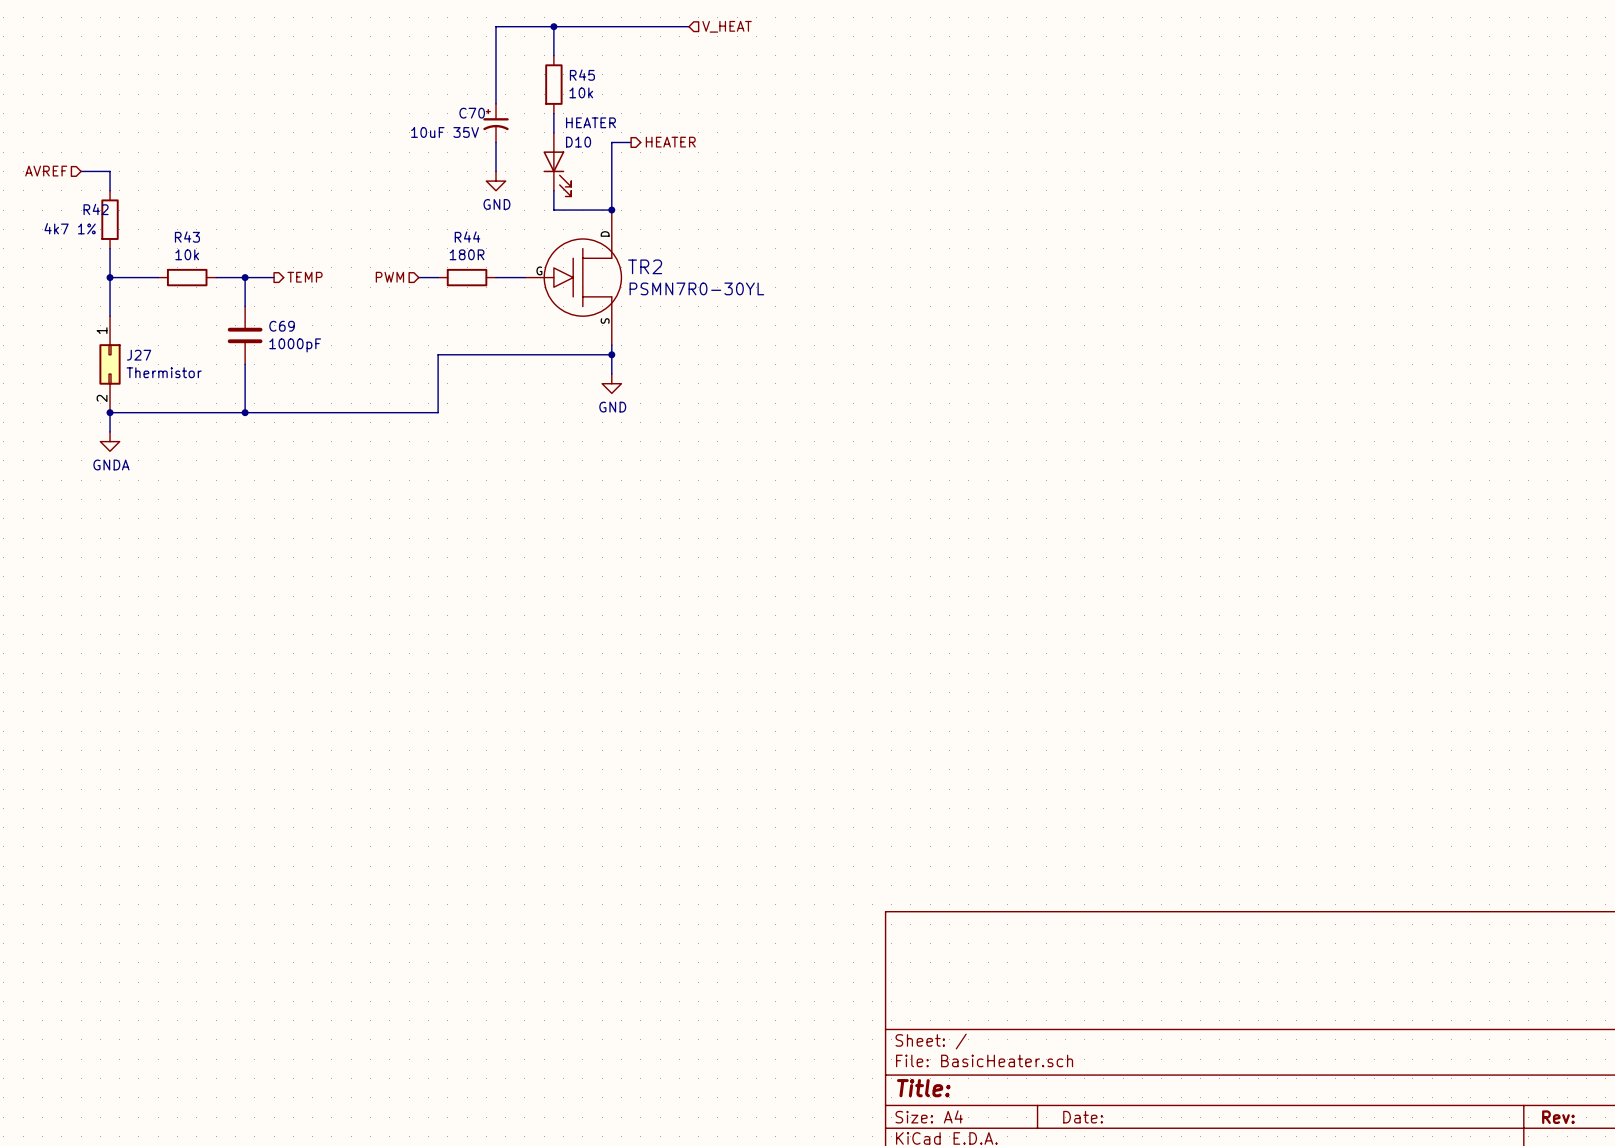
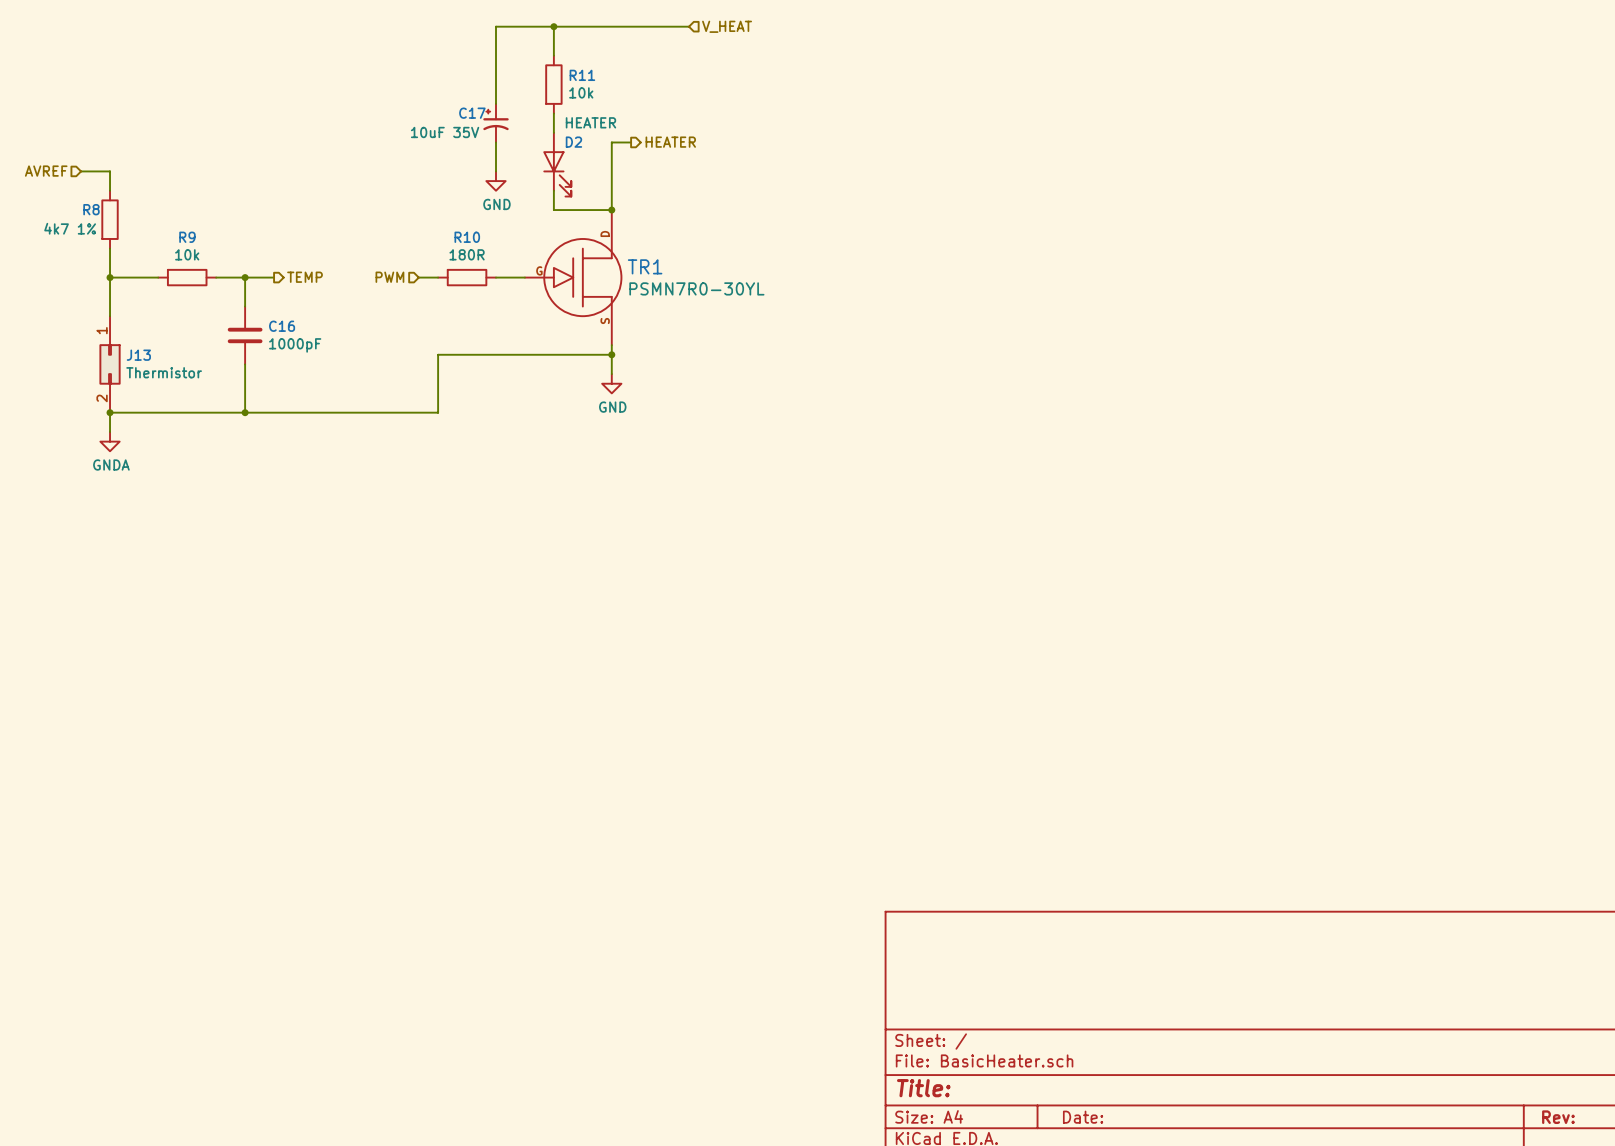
R45 name: R45 (582, 75) -> R11 (582, 75)
C70 name: C70 (472, 113) -> C17 (472, 113)
D10 name: D10 (578, 142) -> D2 (573, 142)
R42 name: R42 (96, 209) -> R8 (91, 209)
R43 name: R43 (187, 237) -> R9 (187, 237)
R44 name: R44 (467, 237) -> R10 (467, 237)
TR2 name: TR2 (645, 266) -> TR1 (645, 266)
C69 name: C69 (282, 326) -> C16 (282, 326)
J27 name: J27 (139, 355) -> J13 (138, 355)

